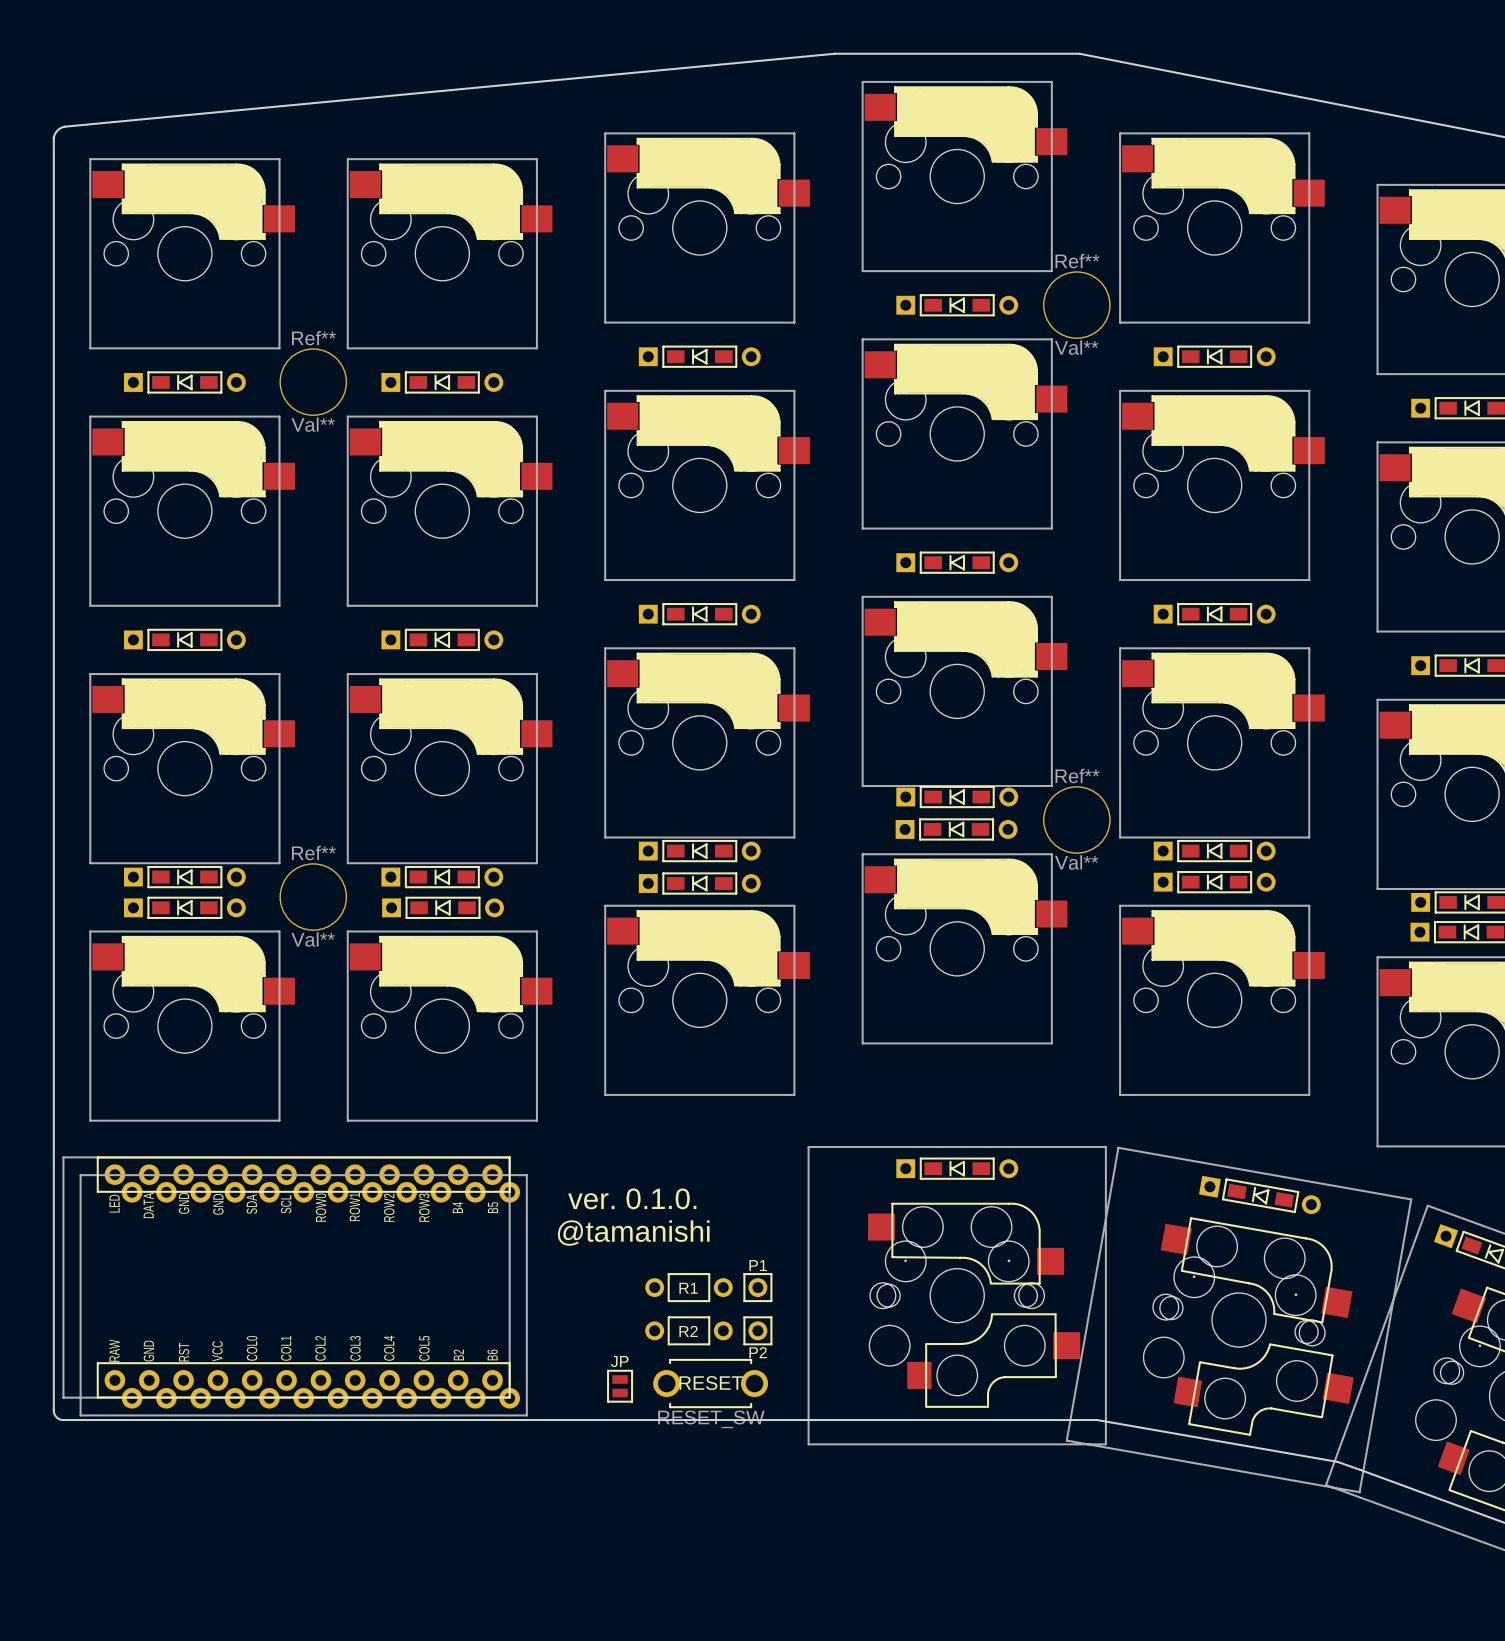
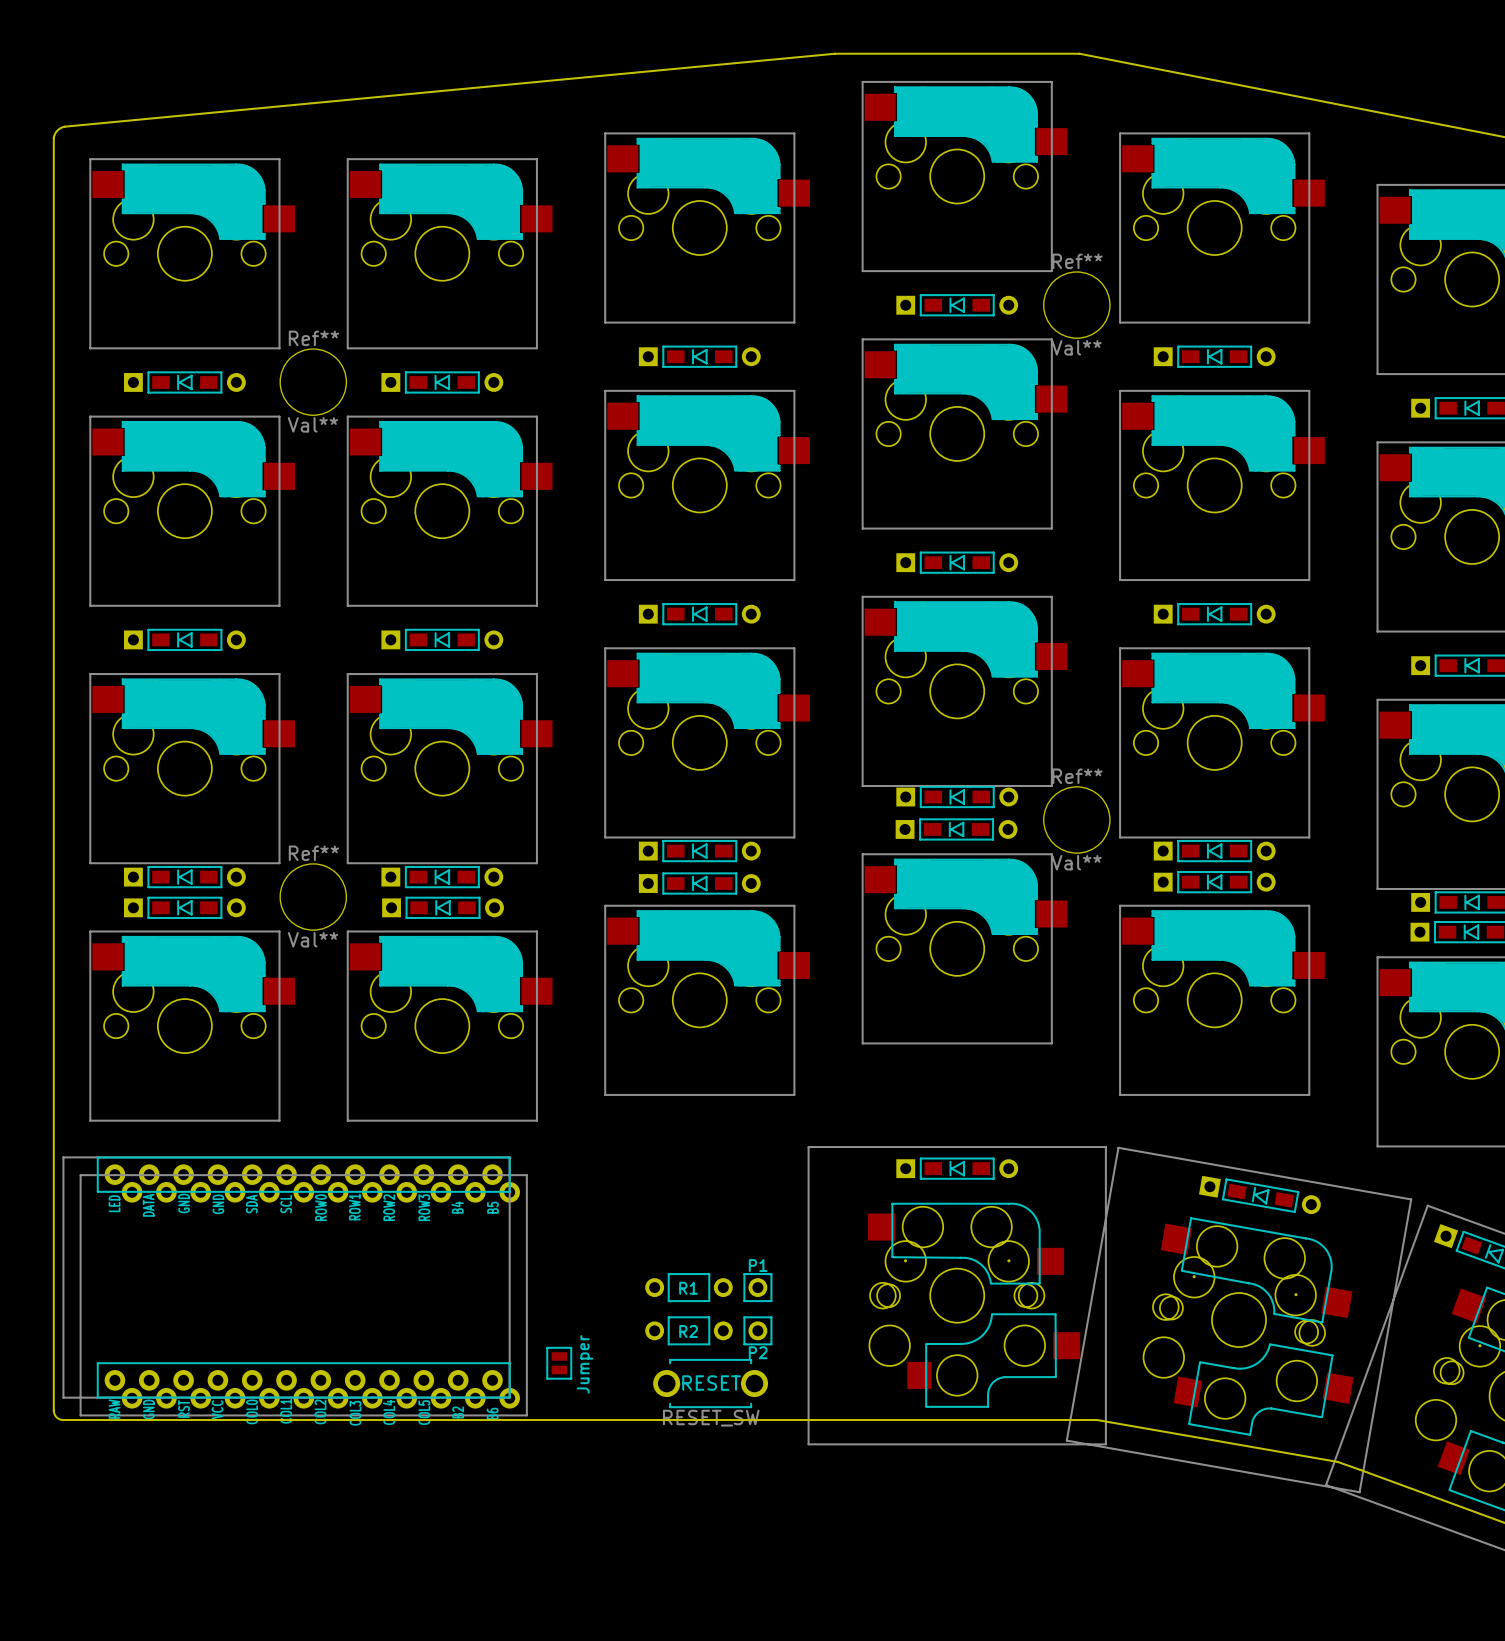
part footprint: [62, 1156, 528, 1417] -> [62, 1156, 528, 1417]
text: ver. 0.1.0. (632, 1198) -> none
text: @tamanishi (633, 1233) -> none
part: none -> Jumper (559, 1363)
part: JP (620, 1386) -> none

